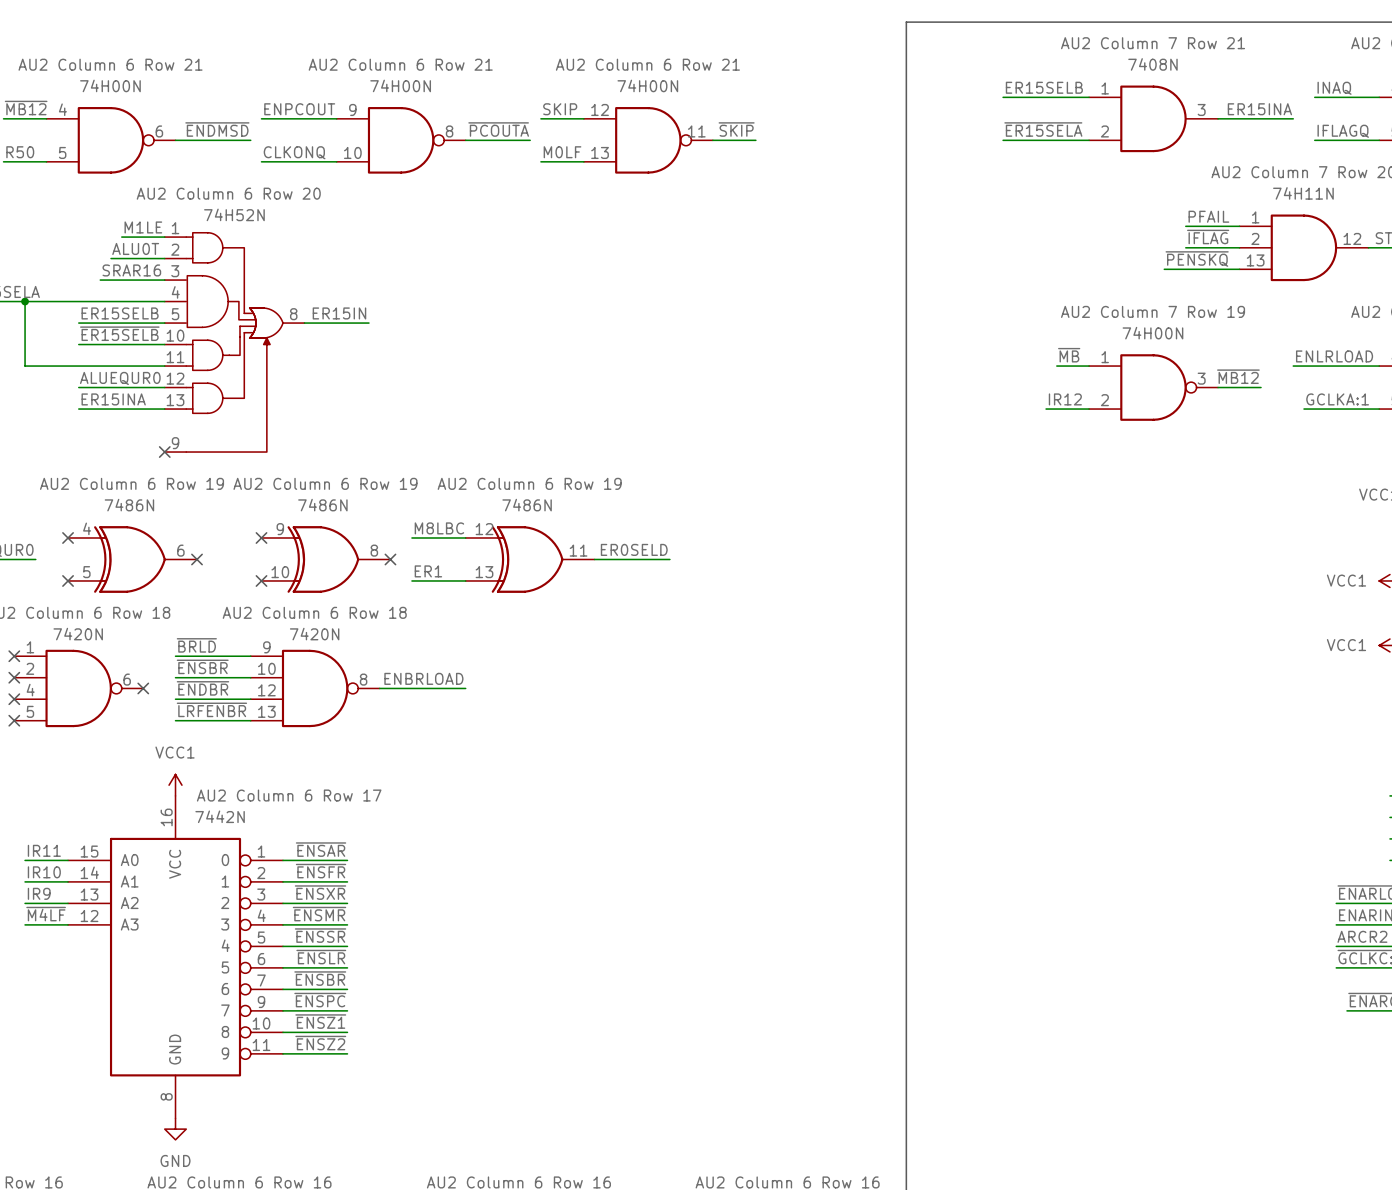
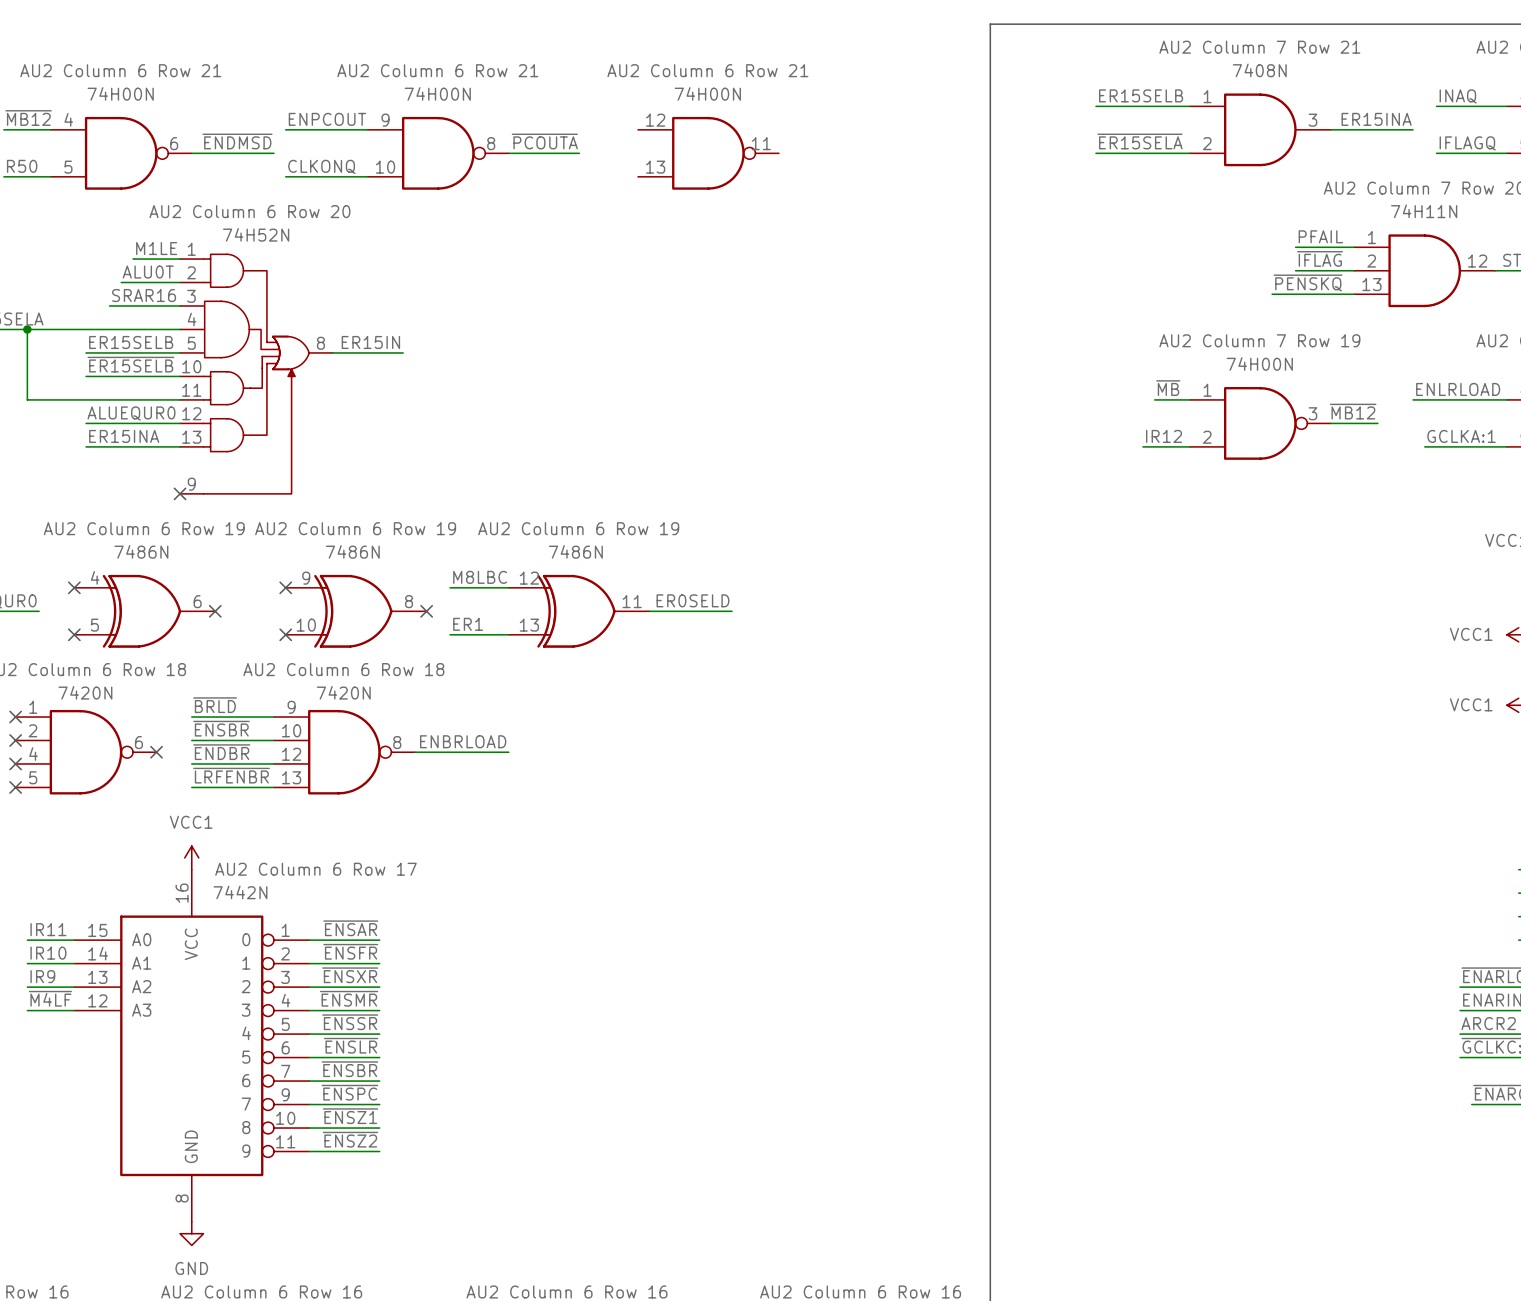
label: SKIP (560, 109) -> none
wire: (540, 118) (583, 118) -> none
label: ~{SKIP} (736, 129) -> none
wire: (712, 140) (755, 140) -> none
label: M0LF (562, 152) -> none
wire: (540, 161) (583, 161) -> none

